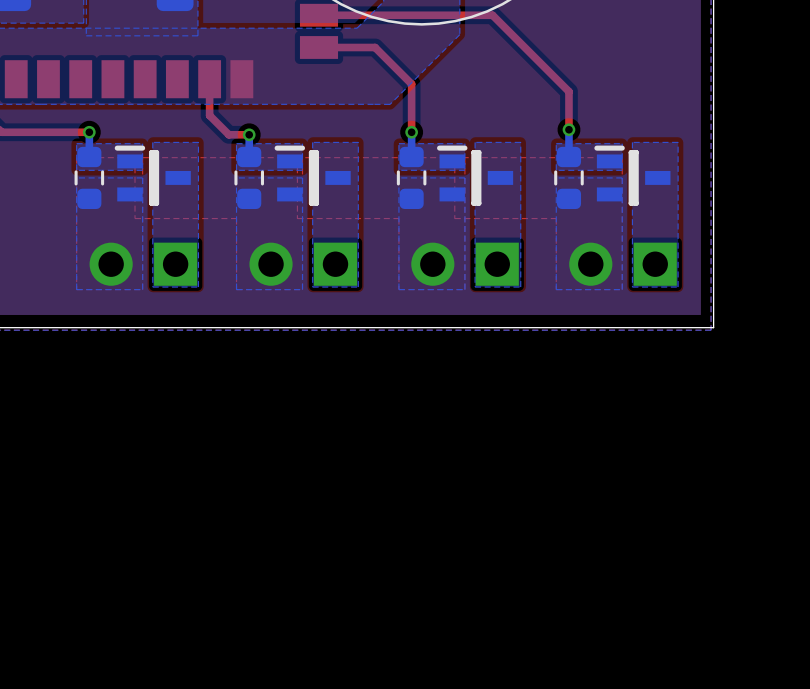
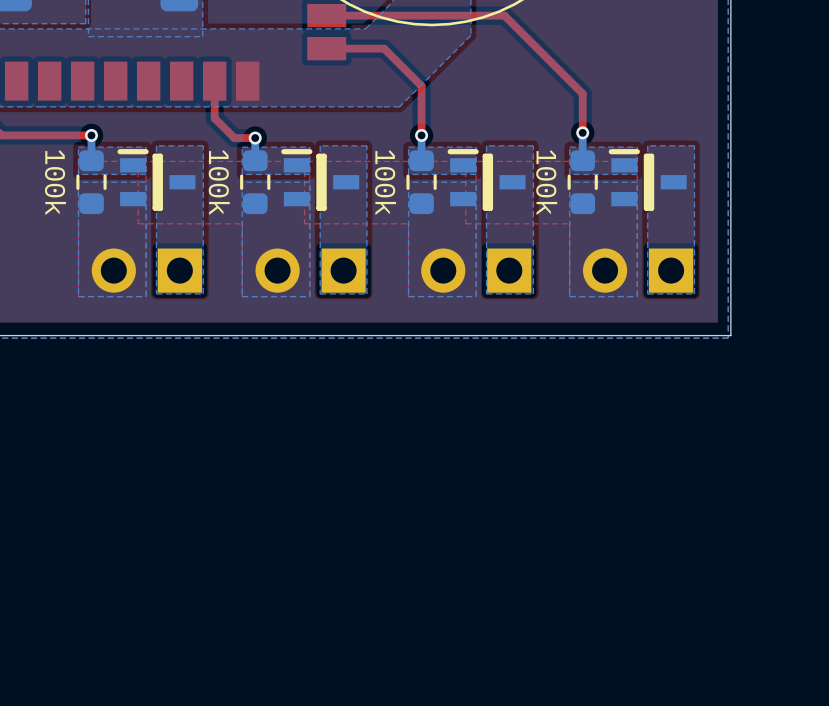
part value: none -> 100k (55, 182)
part value: none -> 100k (219, 182)
part value: none -> 100k (385, 182)
part value: none -> 100k (546, 182)

